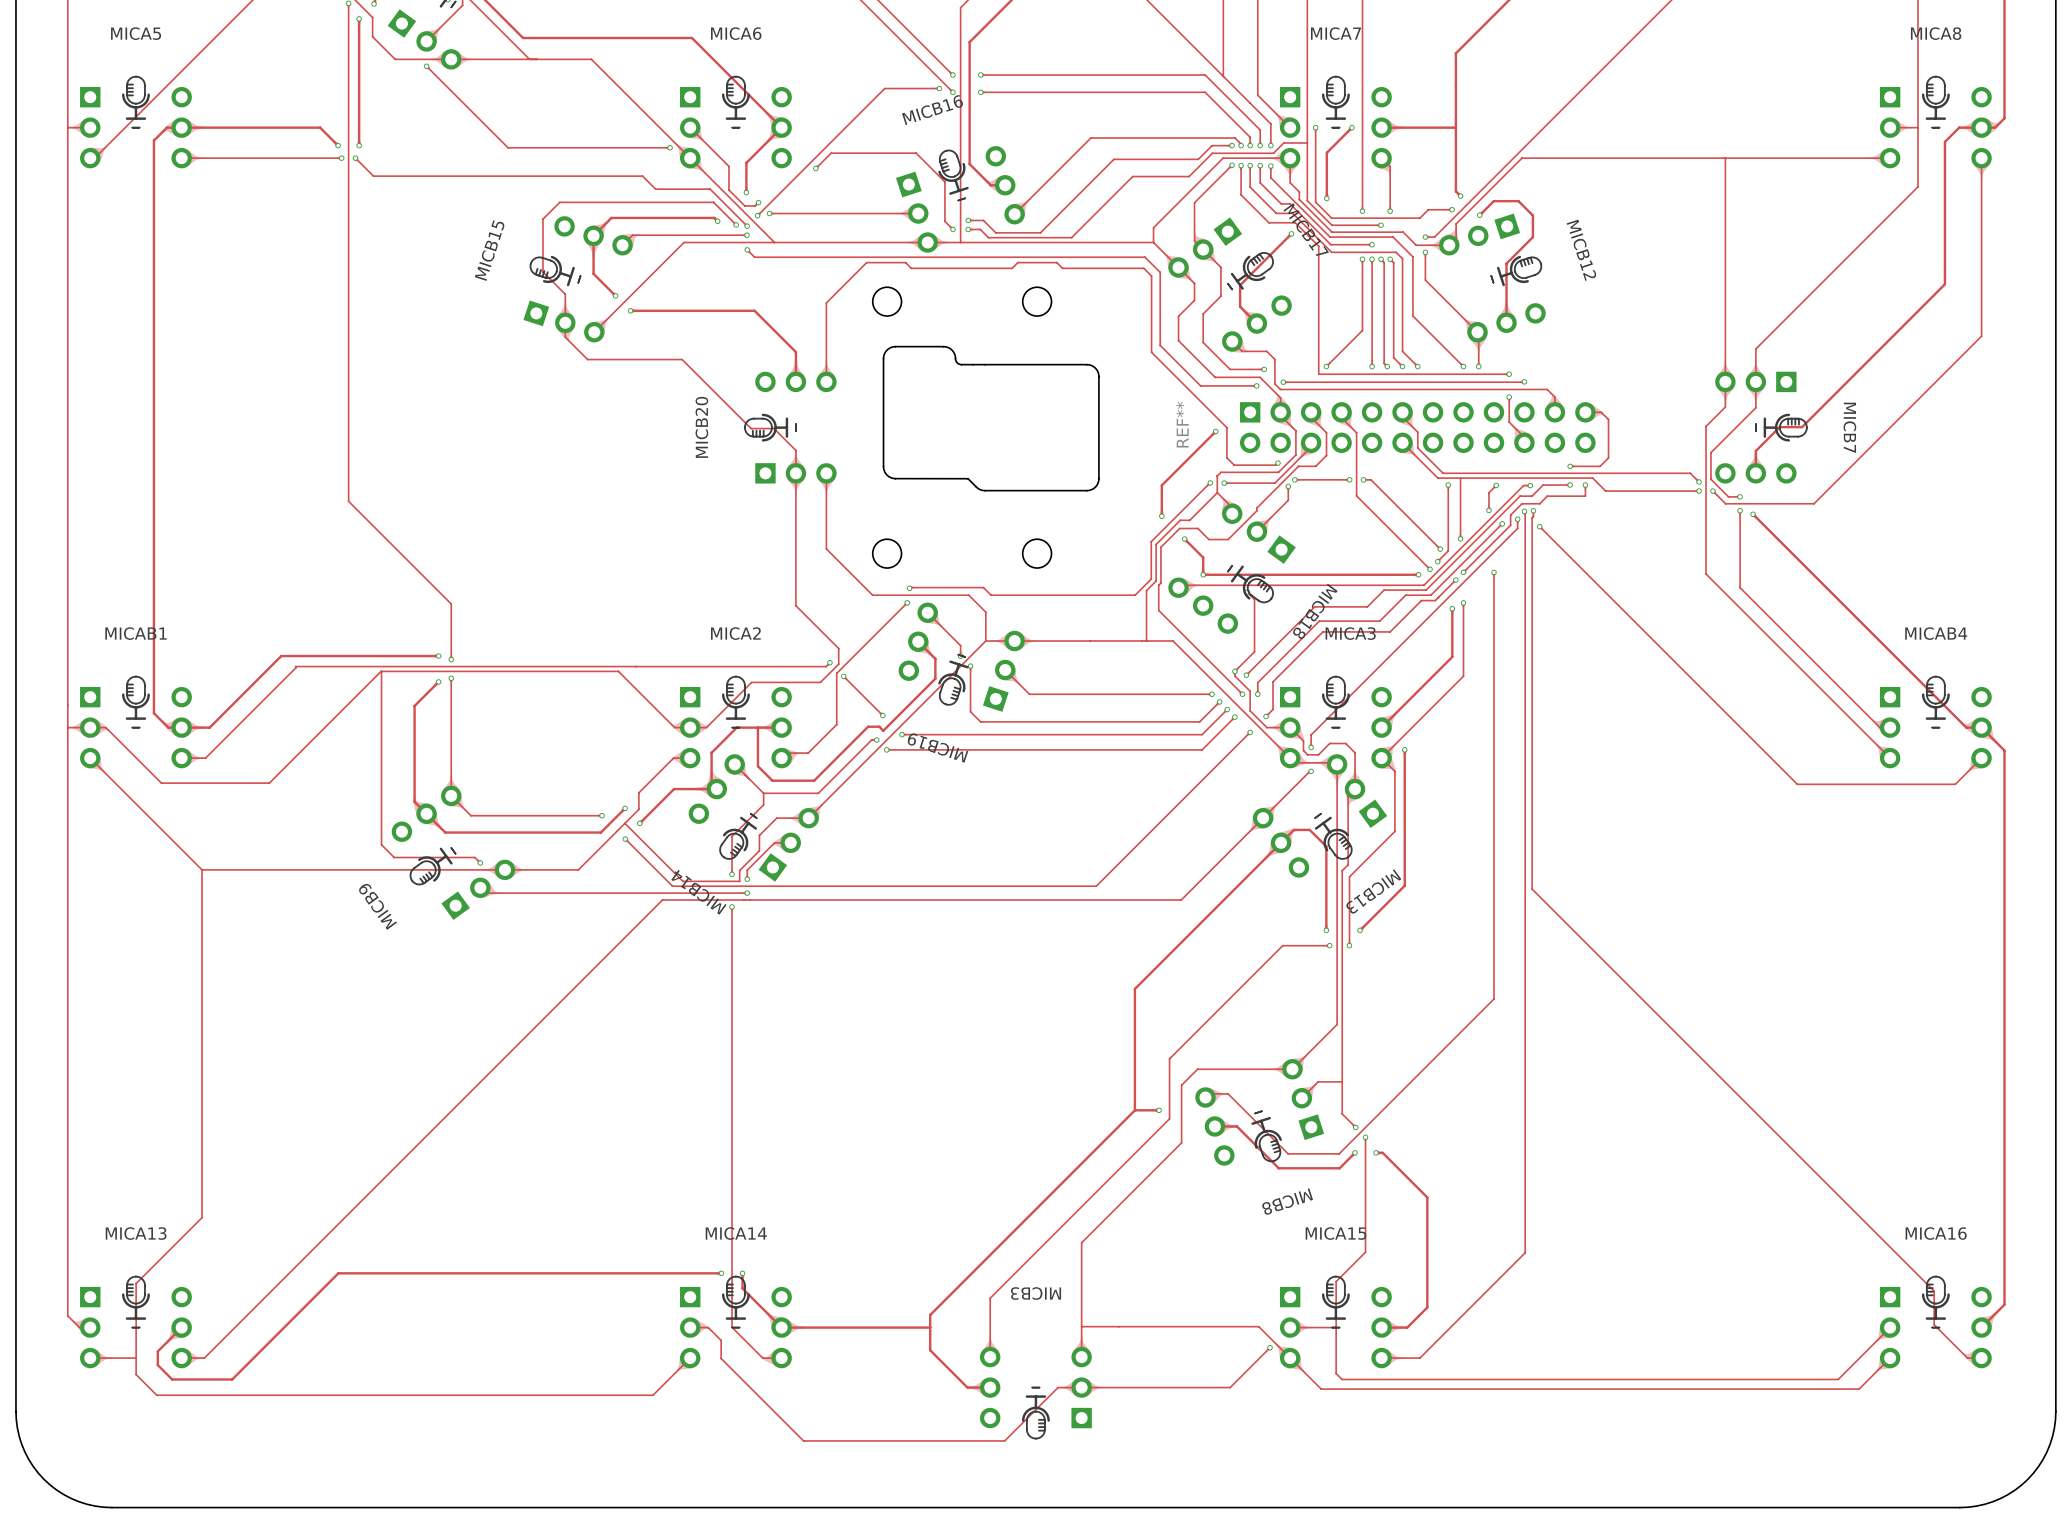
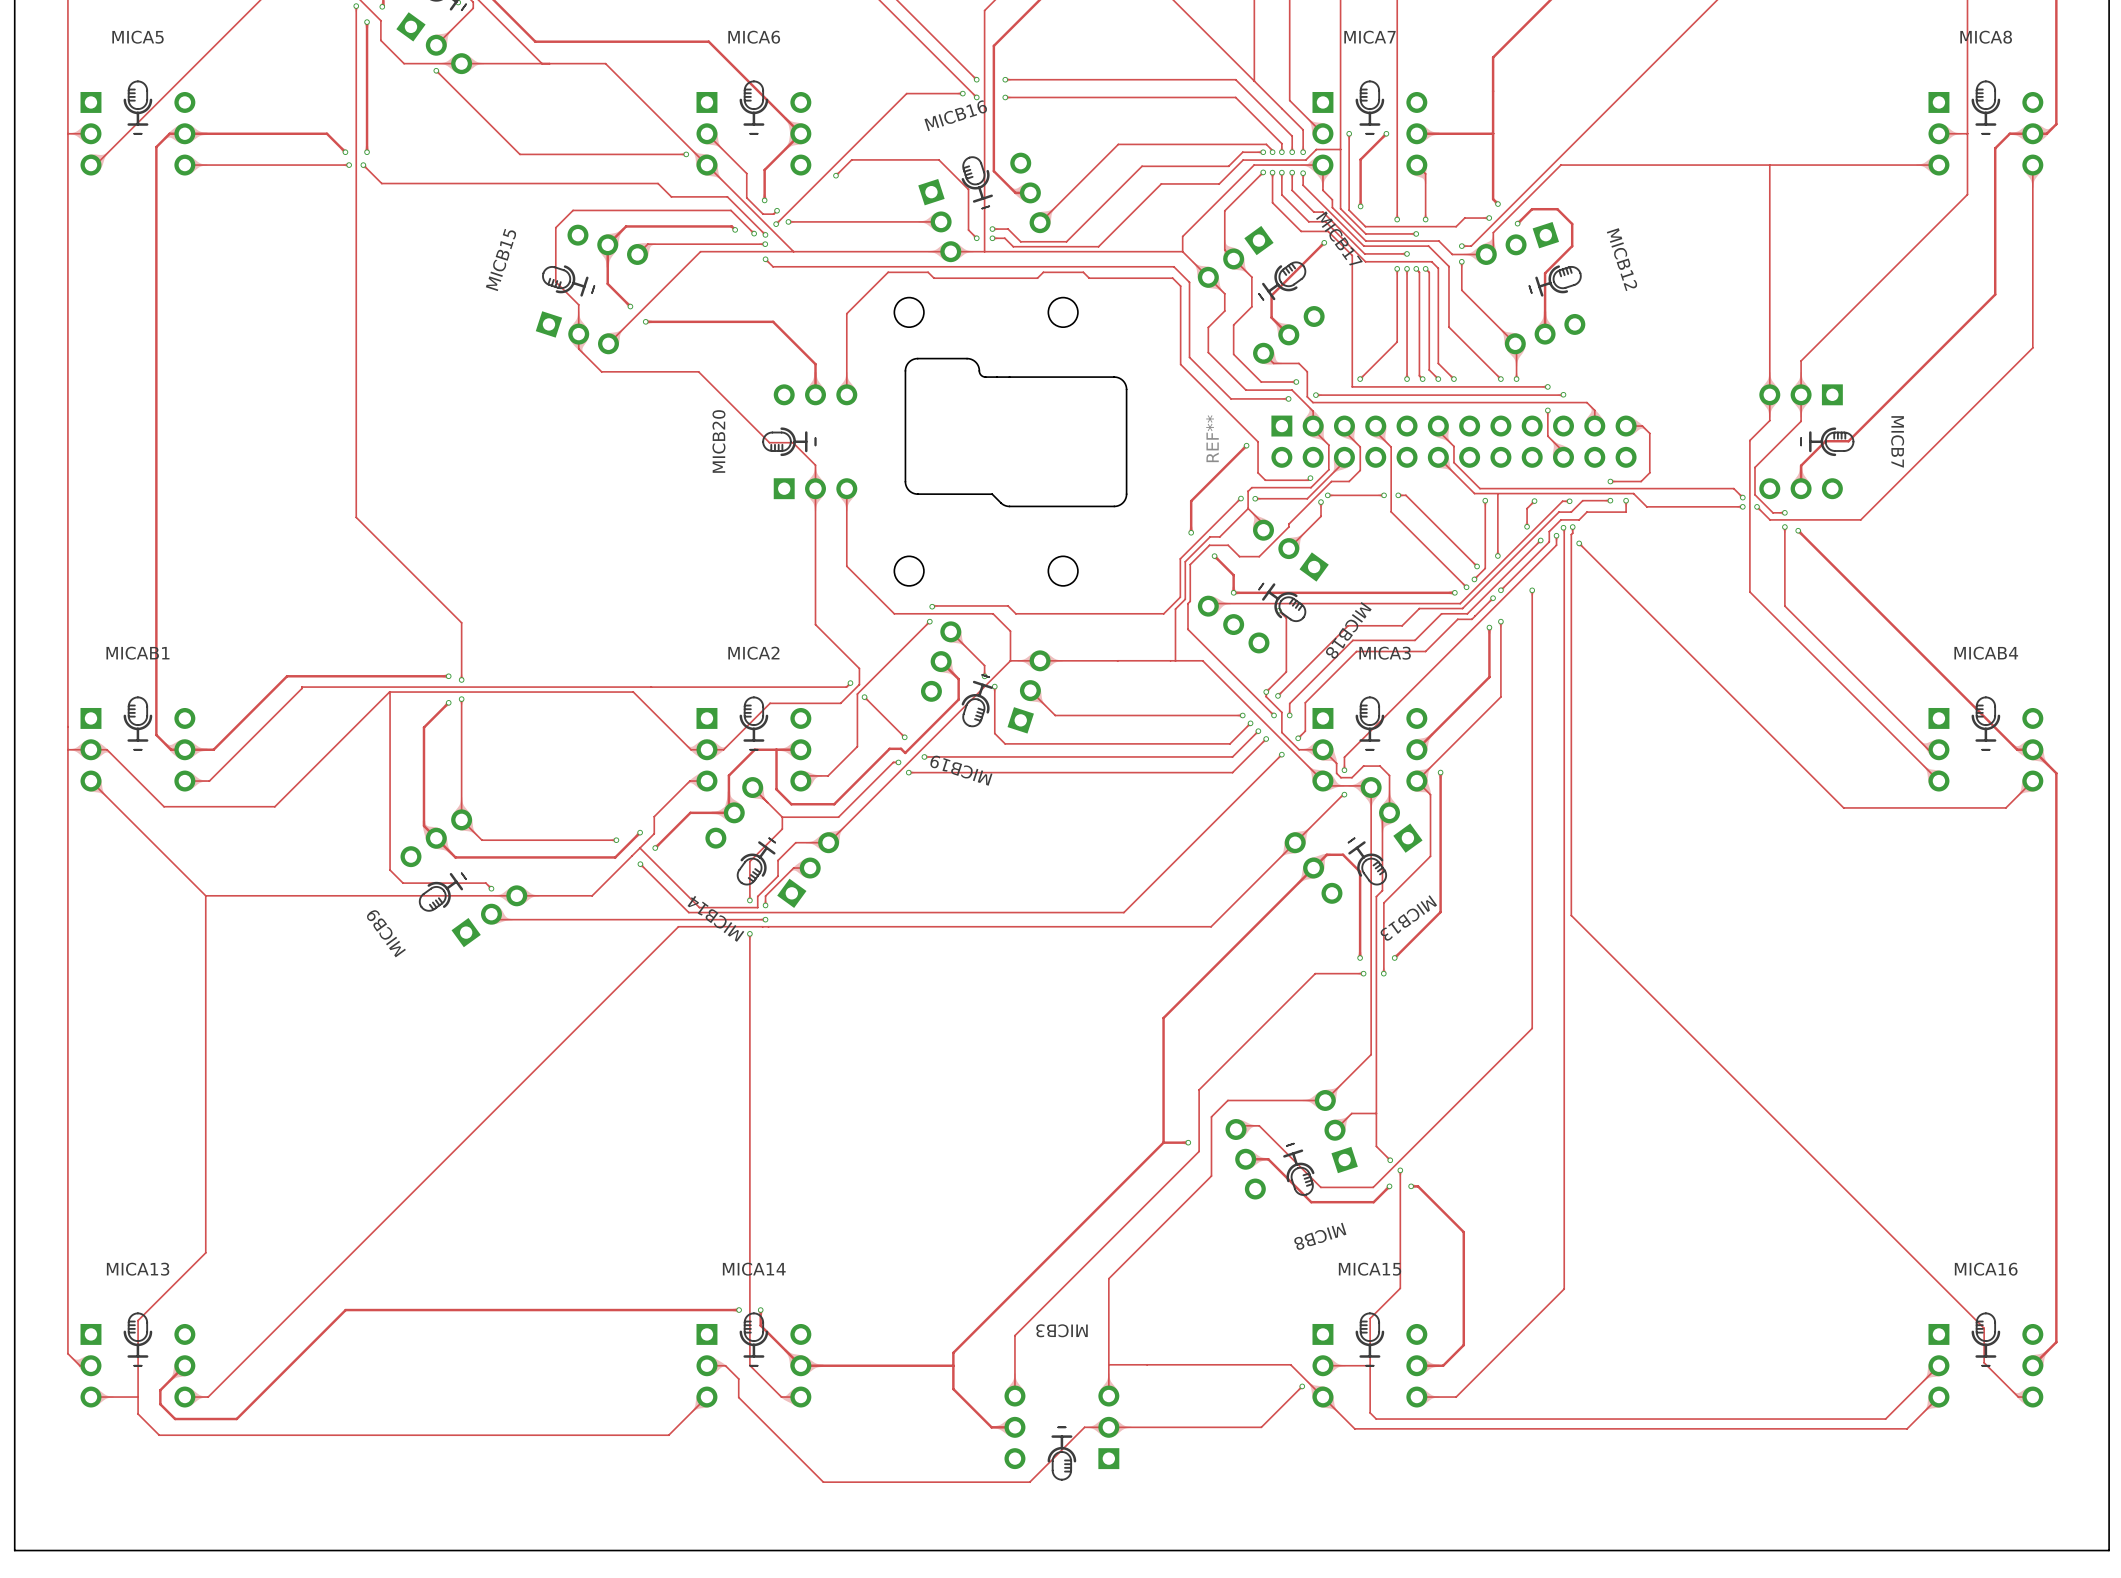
board edge: (15, 1411) (19, 1436) (24, 1452) (44, 1479) (63, 1494) (79, 1501) (111, 1507) -> (14, 1451) (14, 1550) (113, 1550)
board edge: (2055, 1411) (2050, 1444) (2038, 1466) (2027, 1479) (2000, 1498) (1984, 1504) (1959, 1507) -> (2109, 1451) (2109, 1550) (2010, 1550)

